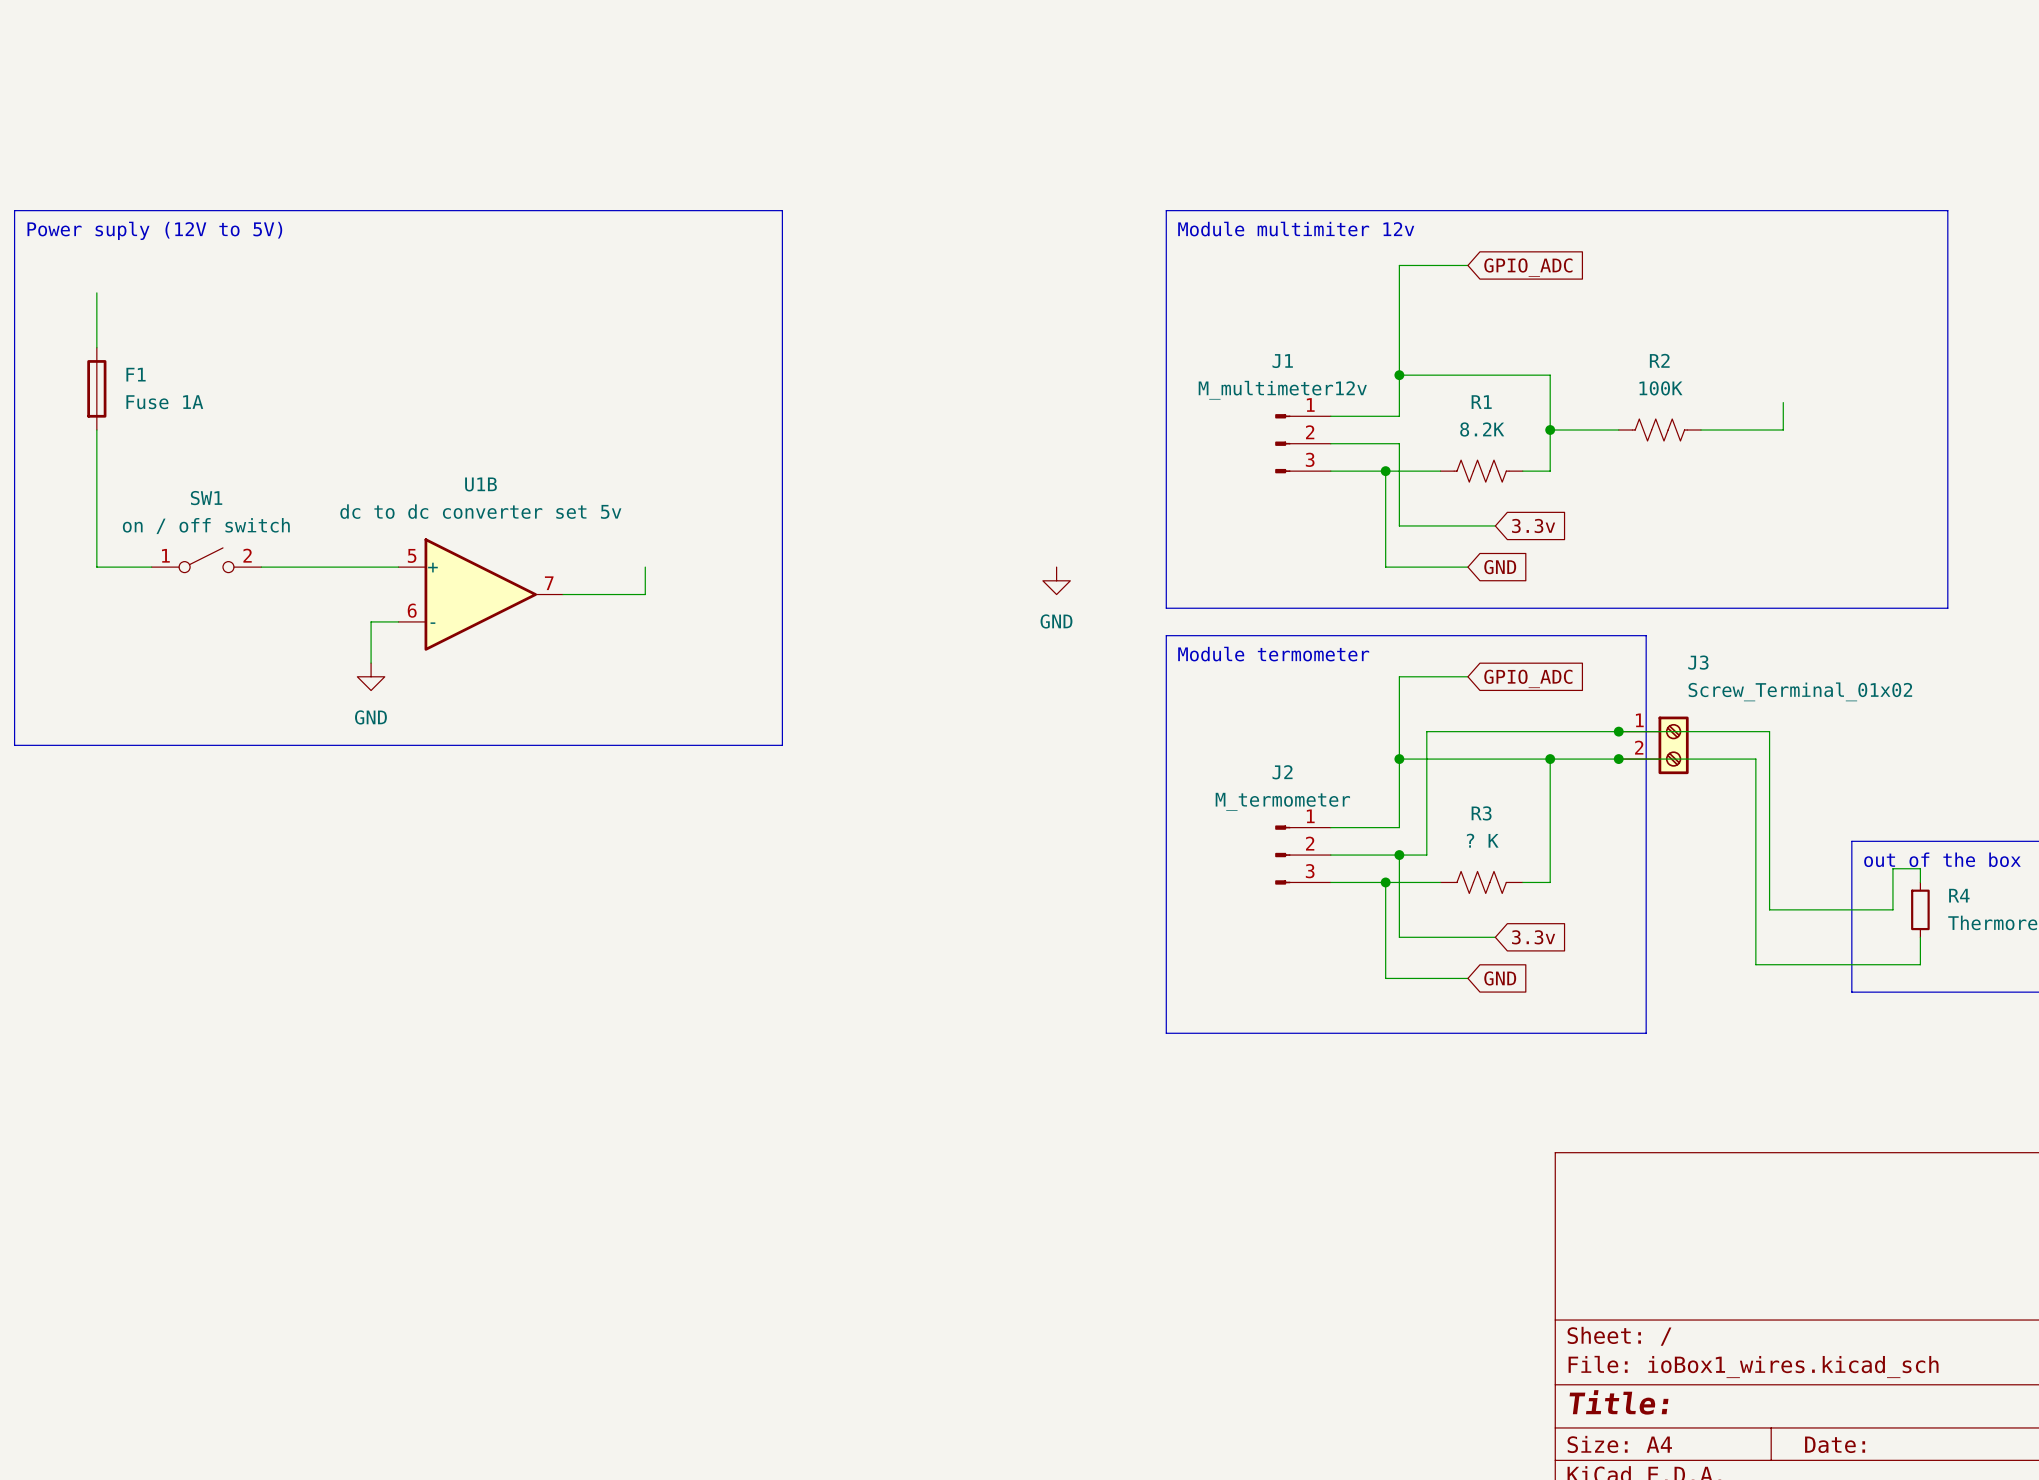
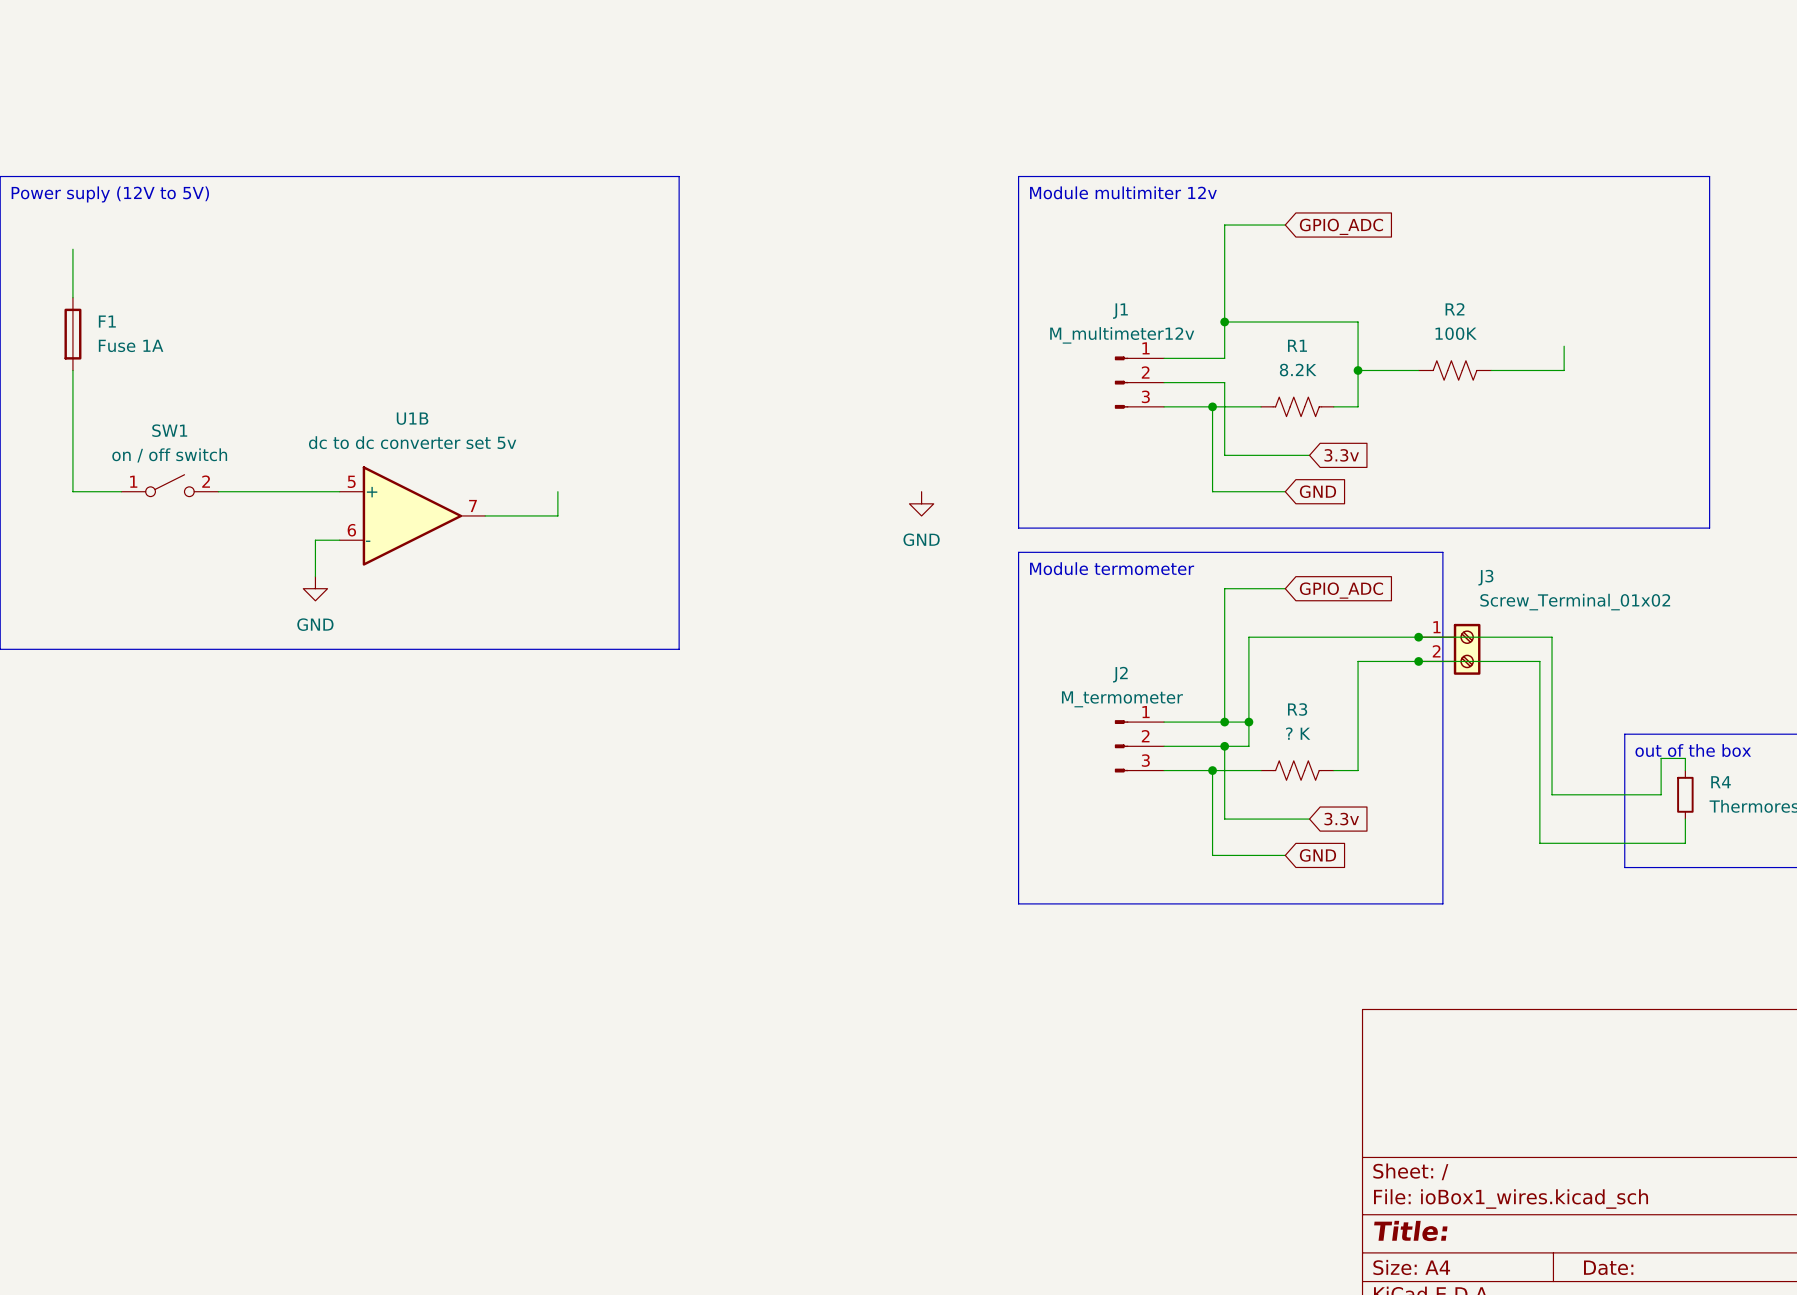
wire: (1399, 759) (1550, 759) -> none
junction: (1399, 759) -> none
junction: (1550, 759) -> none
wire: none -> (1224, 722) (1248, 722)
junction: none -> (1224, 722)
junction: none -> (1248, 722)

